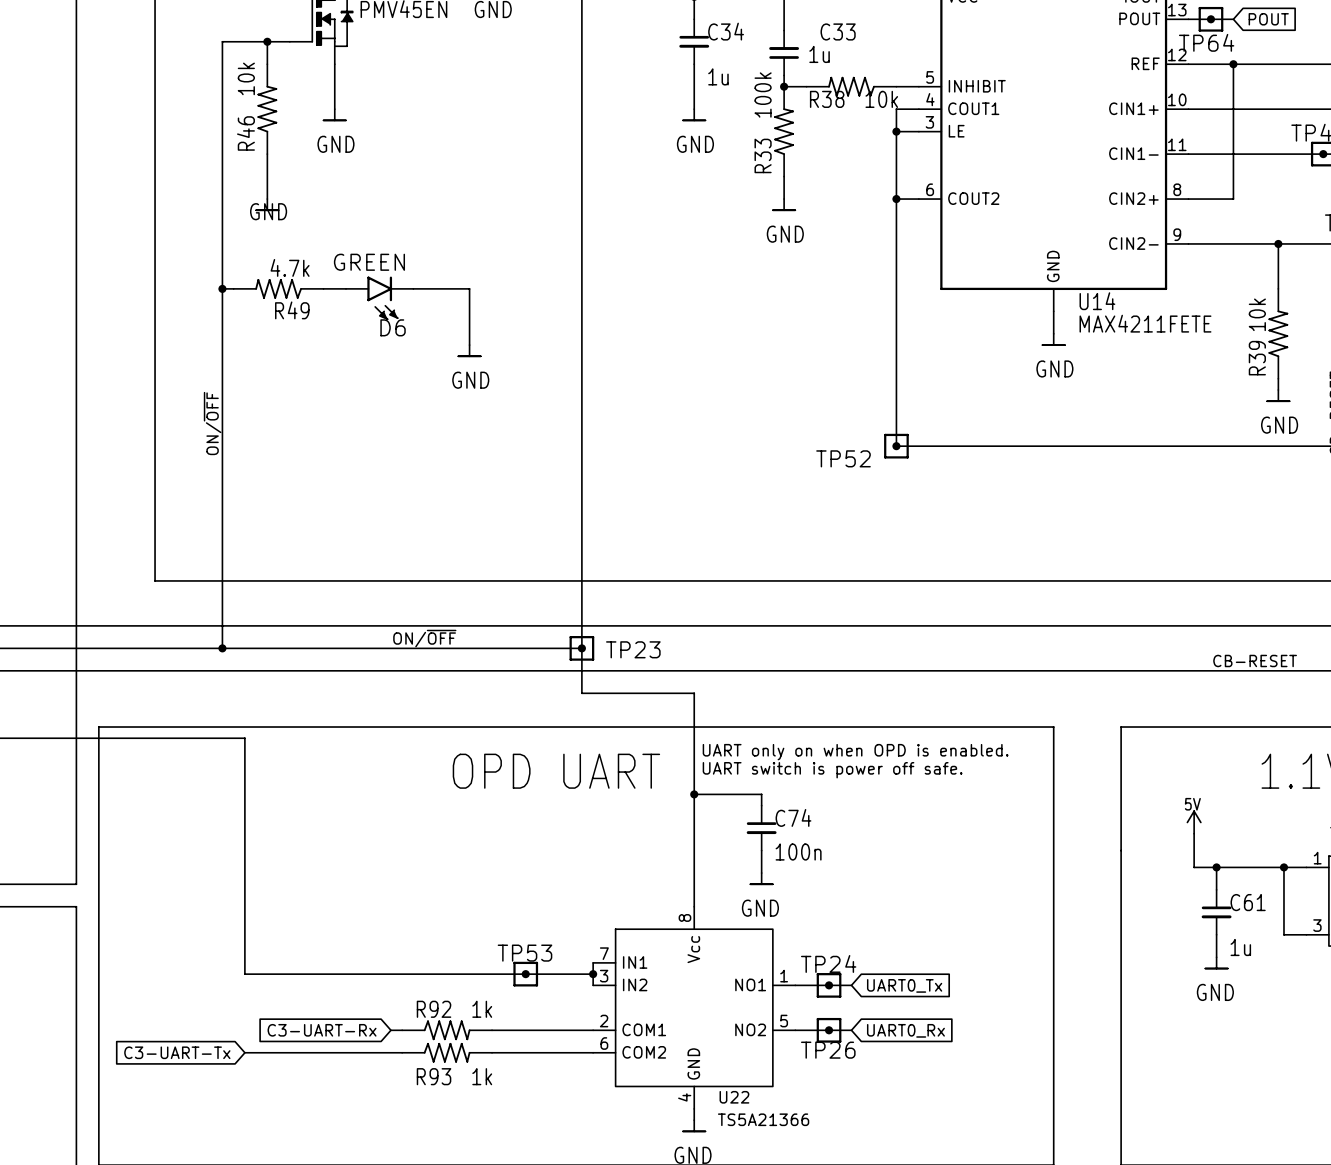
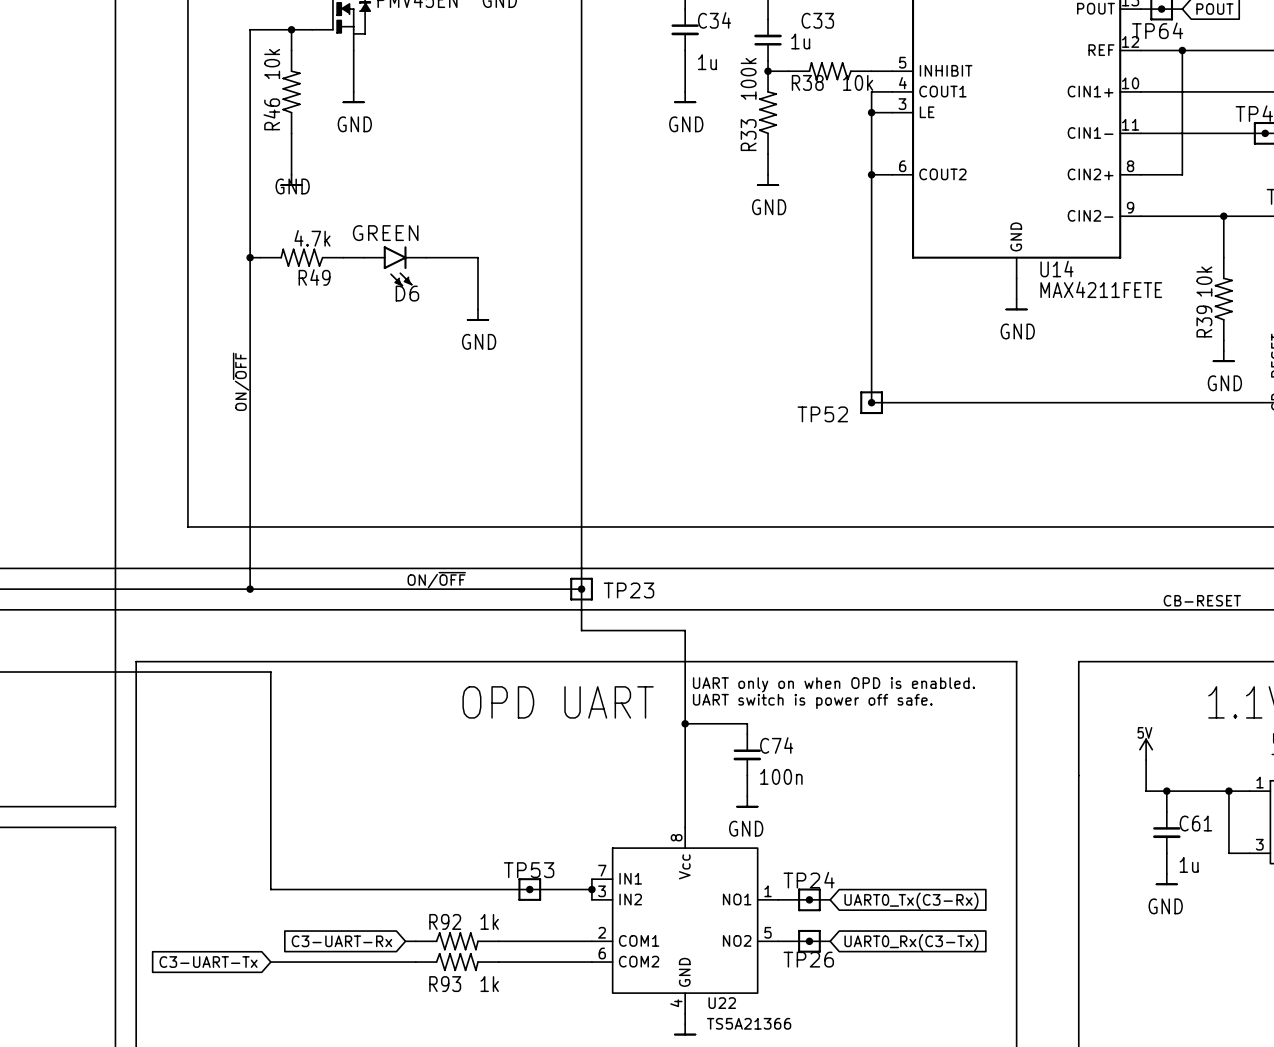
global label: UART0_Tx (904, 985) -> UART0_Tx(C3-Rx) (911, 901)
global label: UART0_Rx (905, 1030) -> UART0_Rx(C3-Tx) (911, 942)

